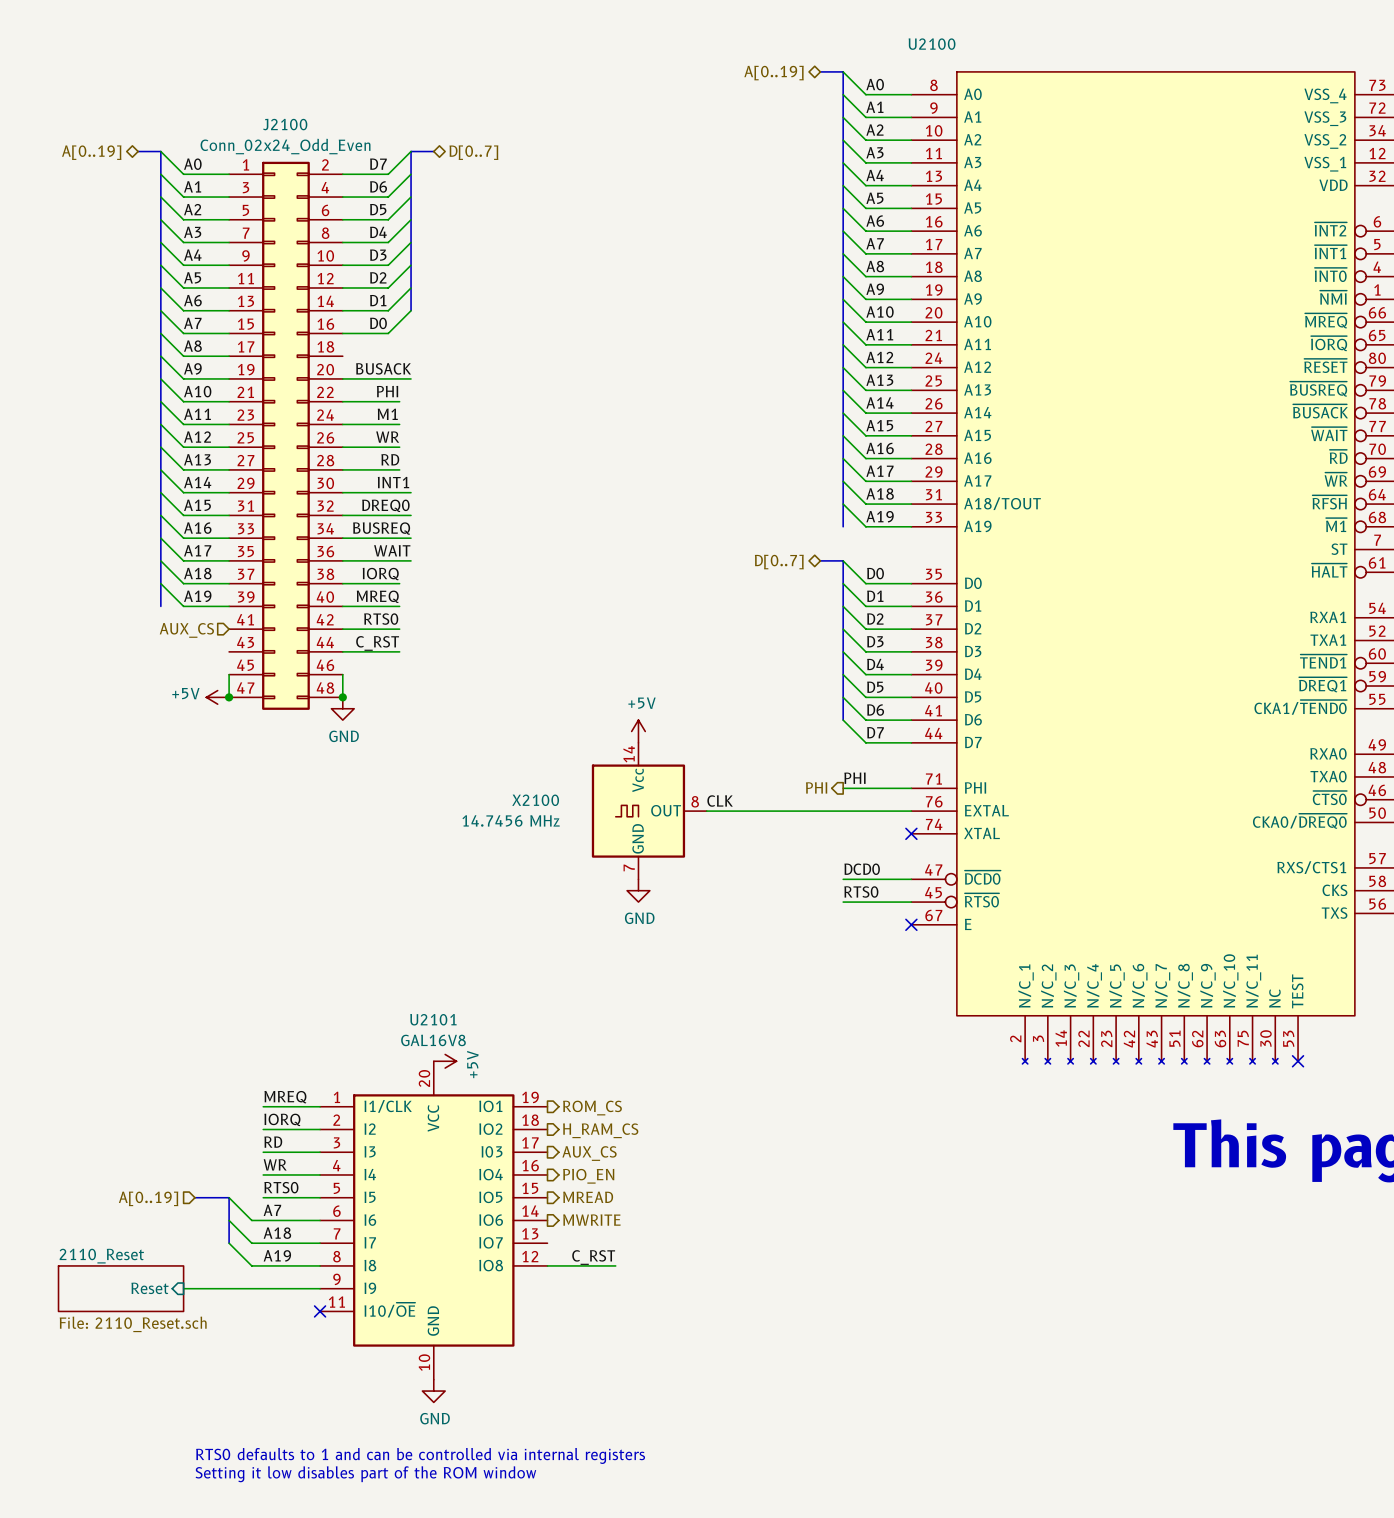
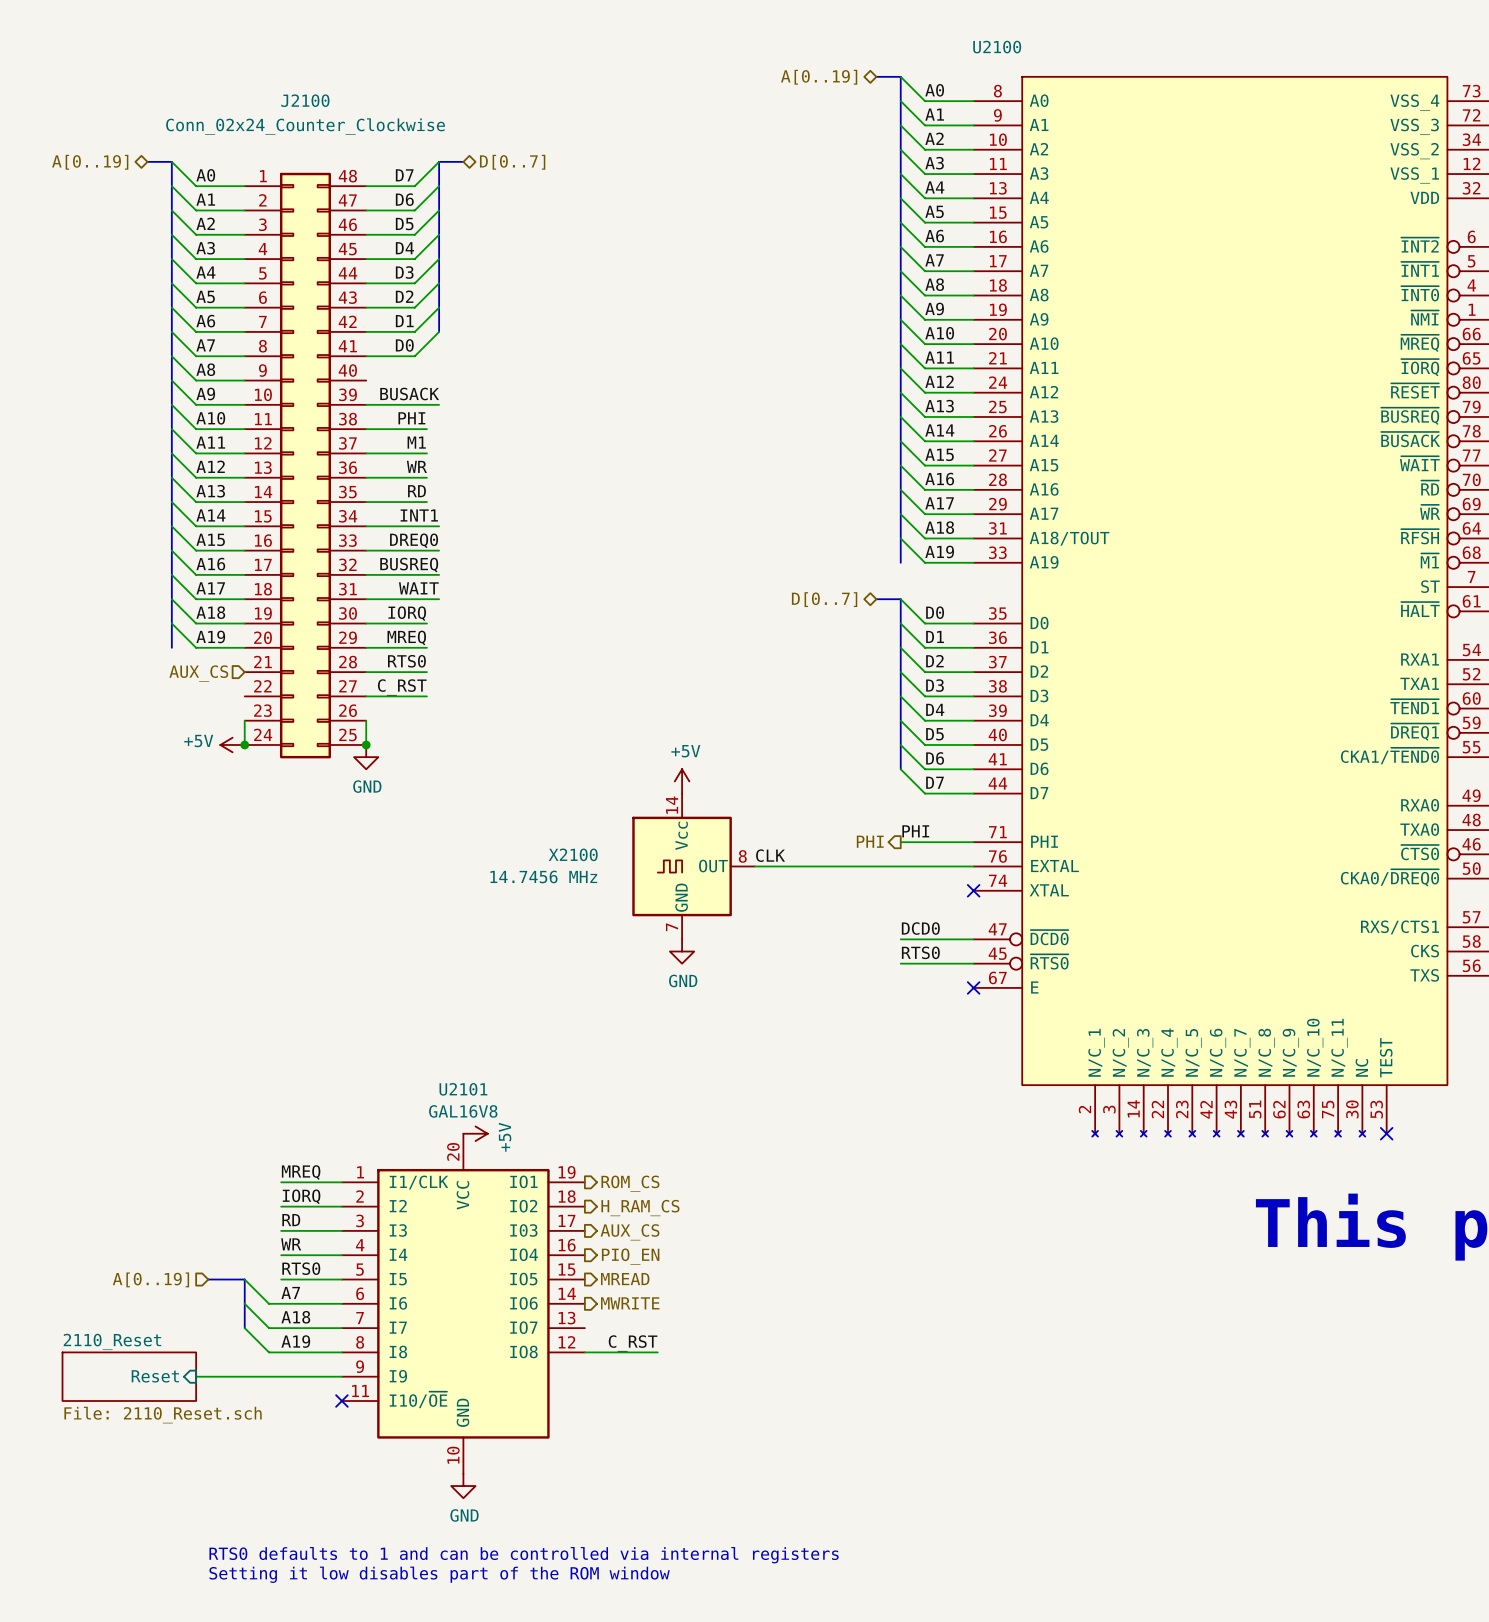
J2100 name position: J2100 (285, 124) -> J2100 (305, 100)
J2100 value: Conn_02x24_Odd_Even (285, 146) -> Conn_02x24_Counter_Clockwise (305, 126)
J2100 symbol: [229, 161, 343, 710] -> [244, 172, 367, 759]

